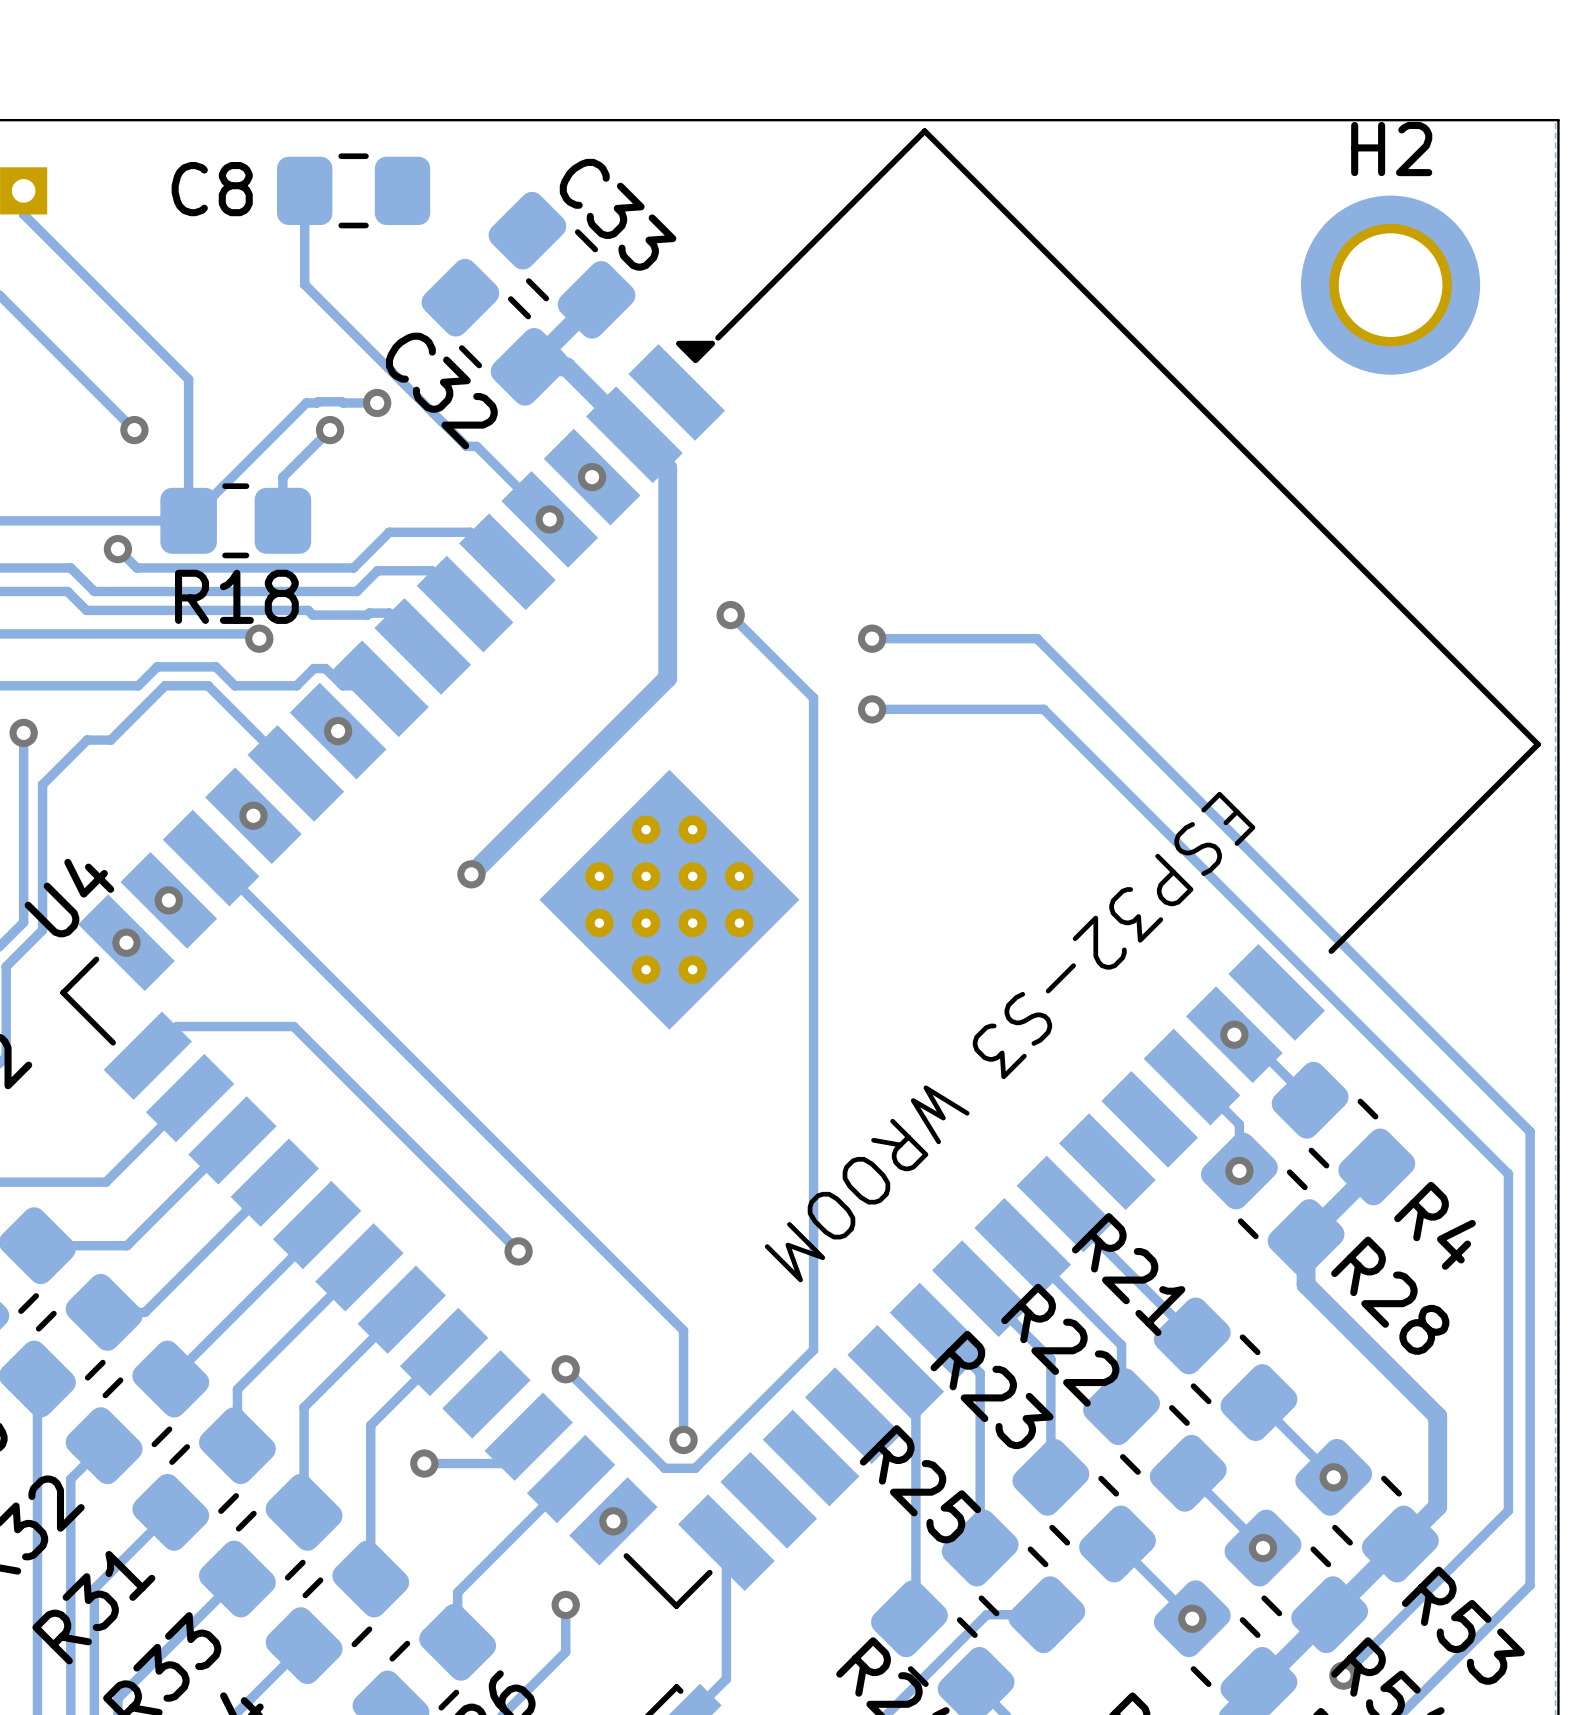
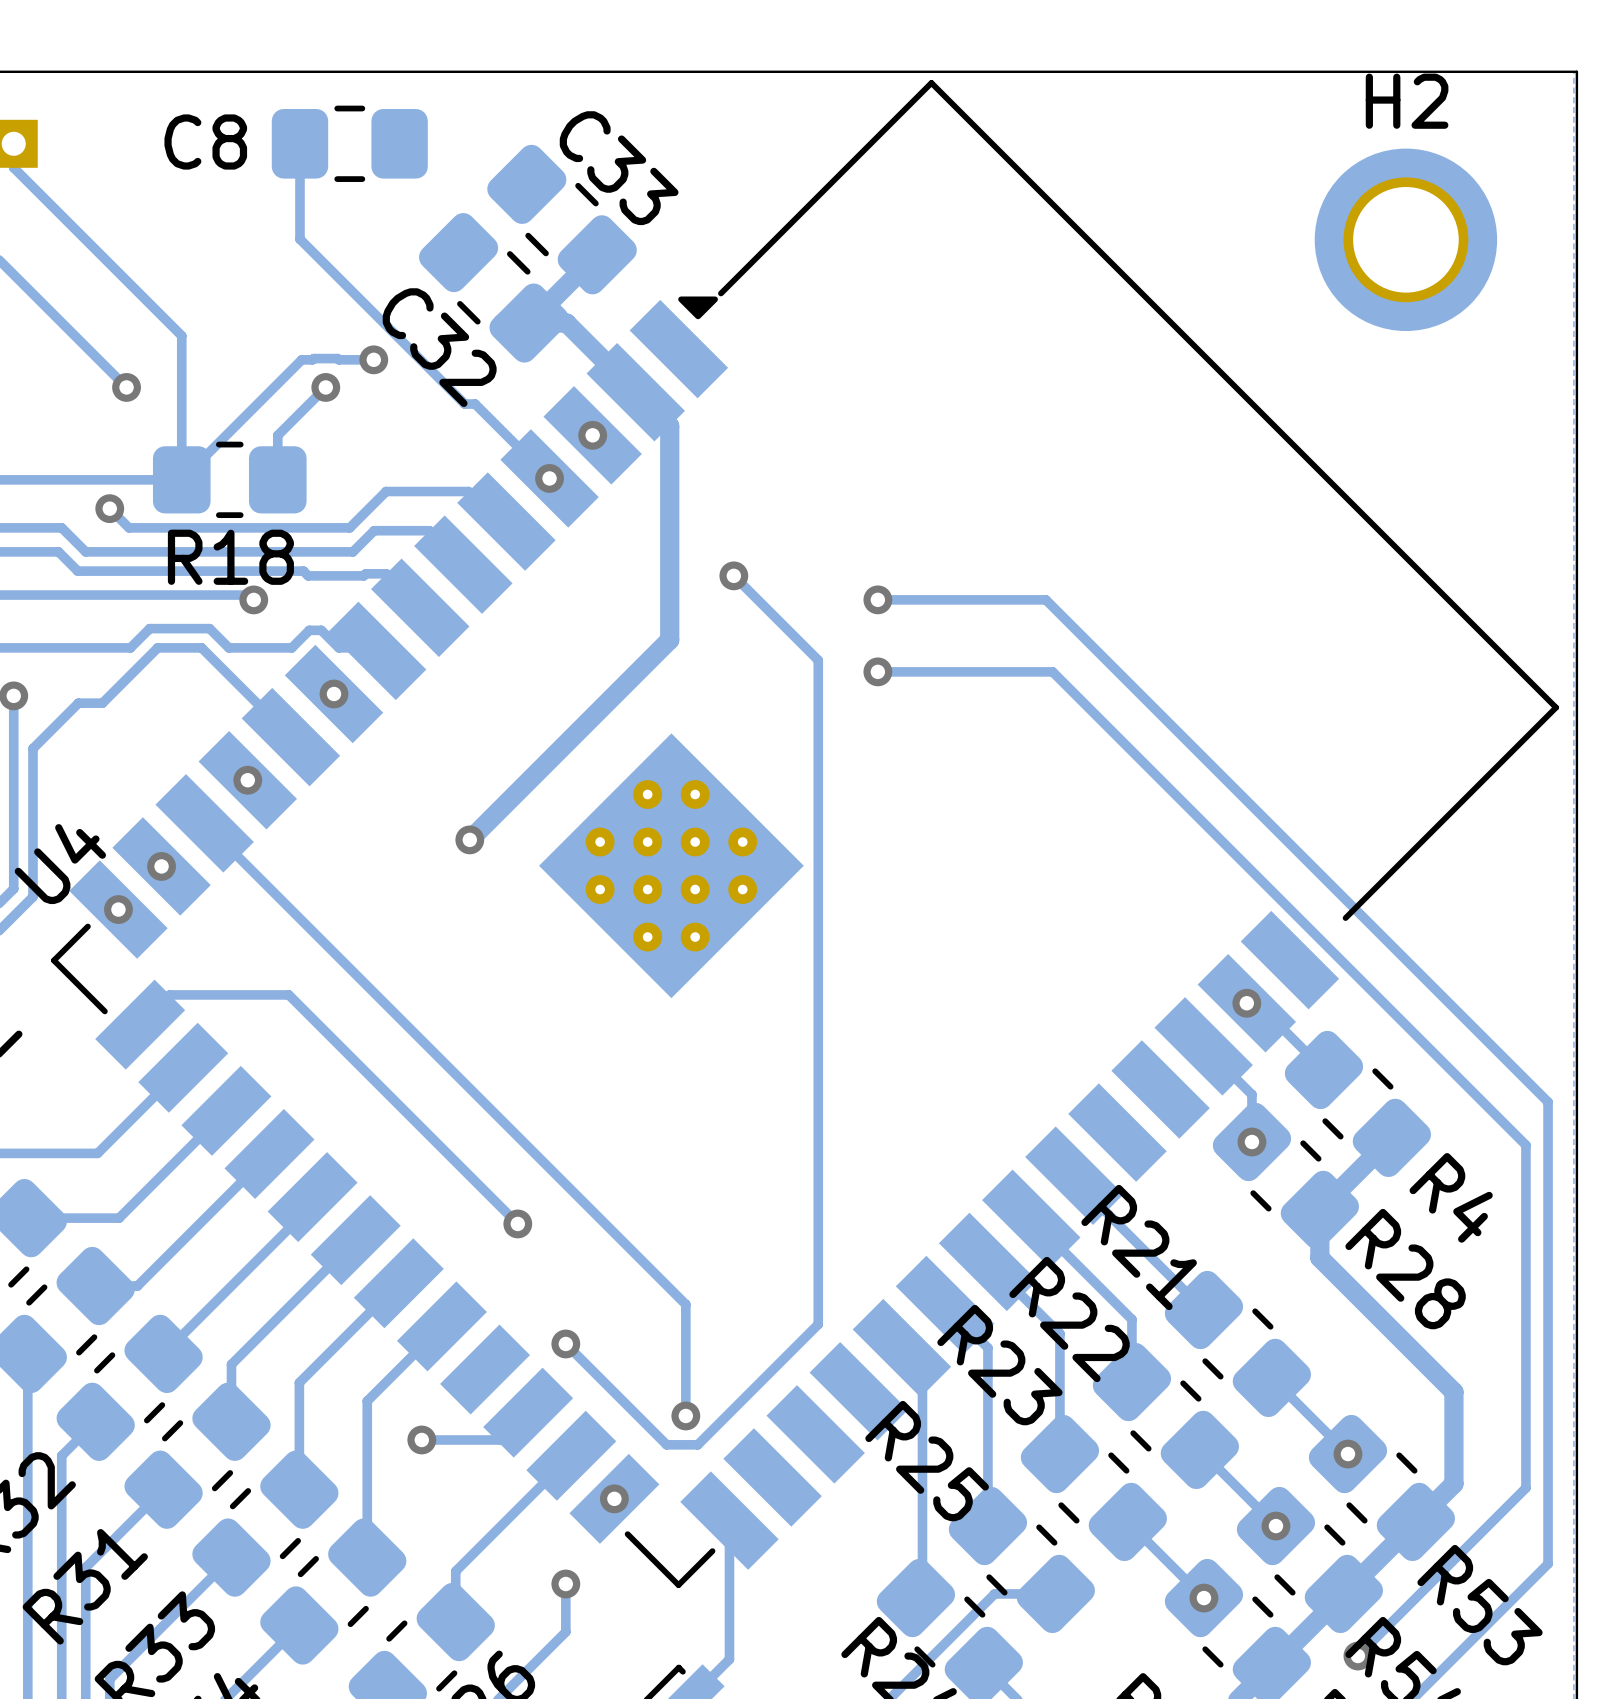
text: ESP32-S3 WROOM (1010, 1037) -> none

